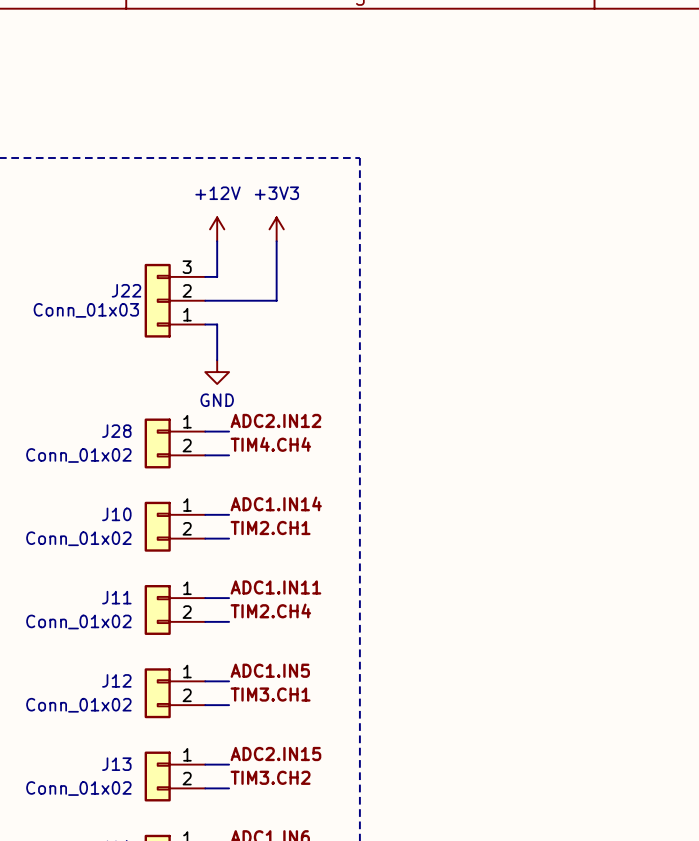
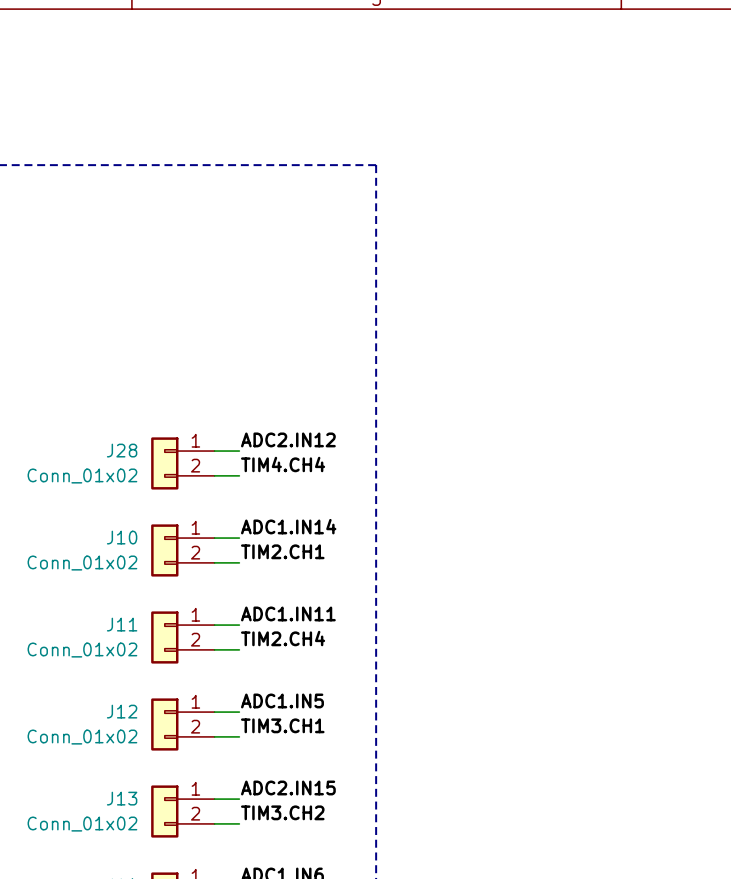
power symbol: +12V (217, 229) -> none
power symbol: +3V3 (276, 229) -> none
wire: (217, 241) (217, 276) (205, 276) -> none
wire: (276, 241) (276, 300) (205, 300) -> none
J22: Conn_01x03 (174, 300) -> none
wire: (205, 324) (217, 324) (217, 360) -> none
power symbol: GND (217, 372) -> none

